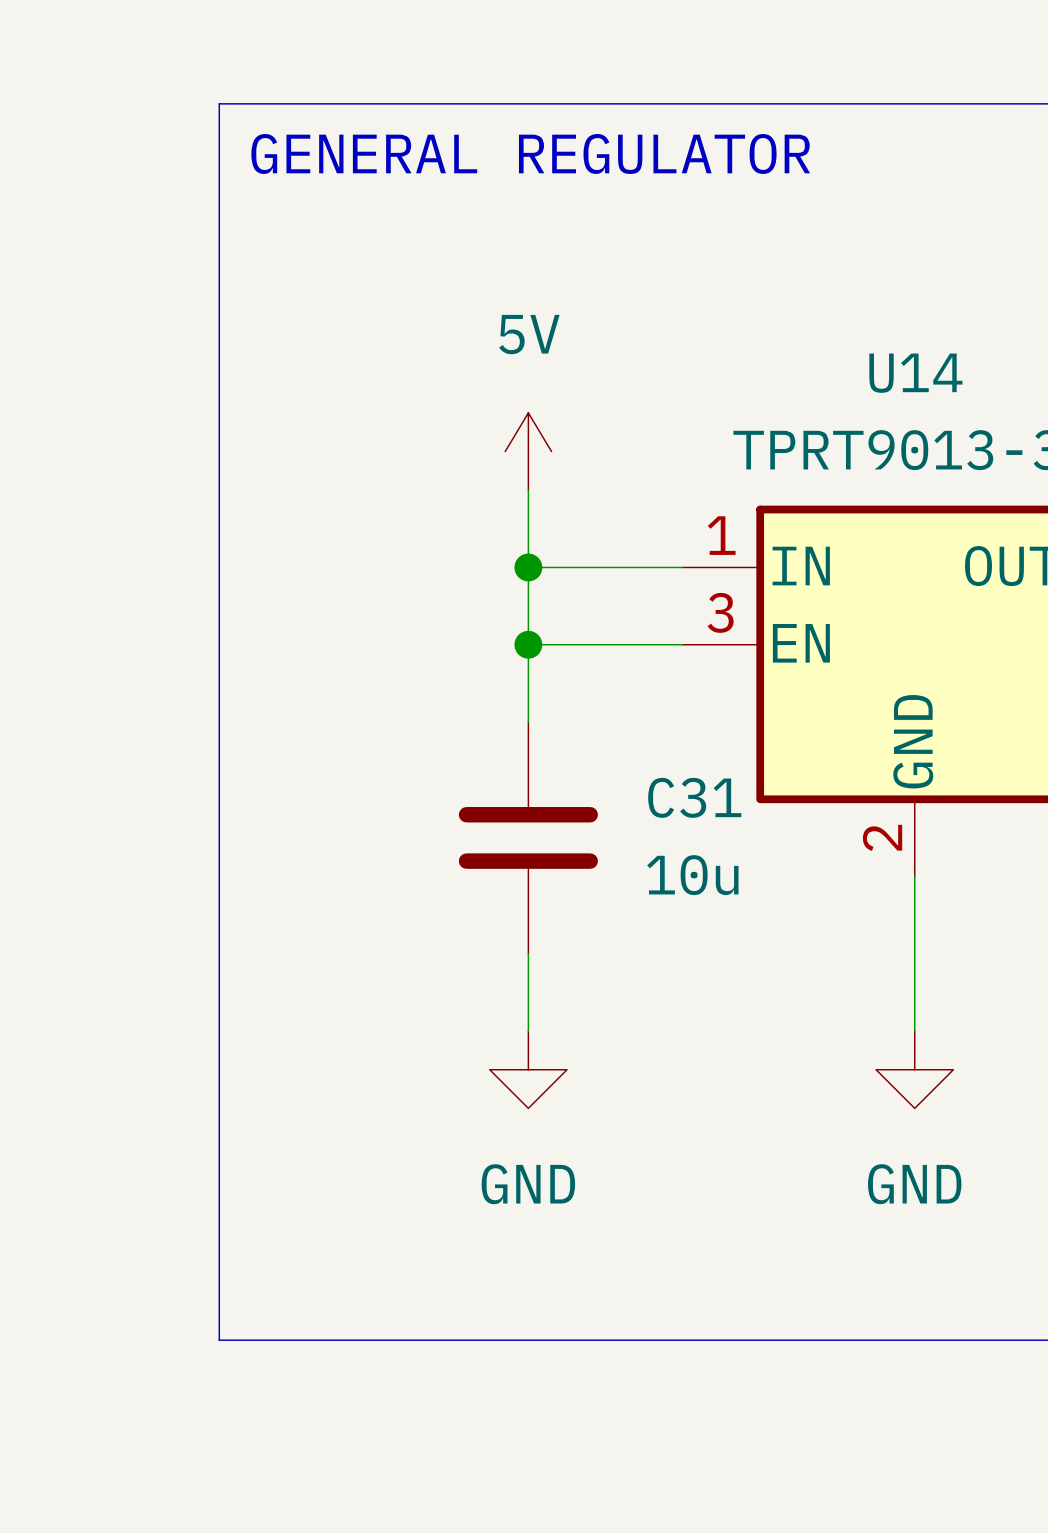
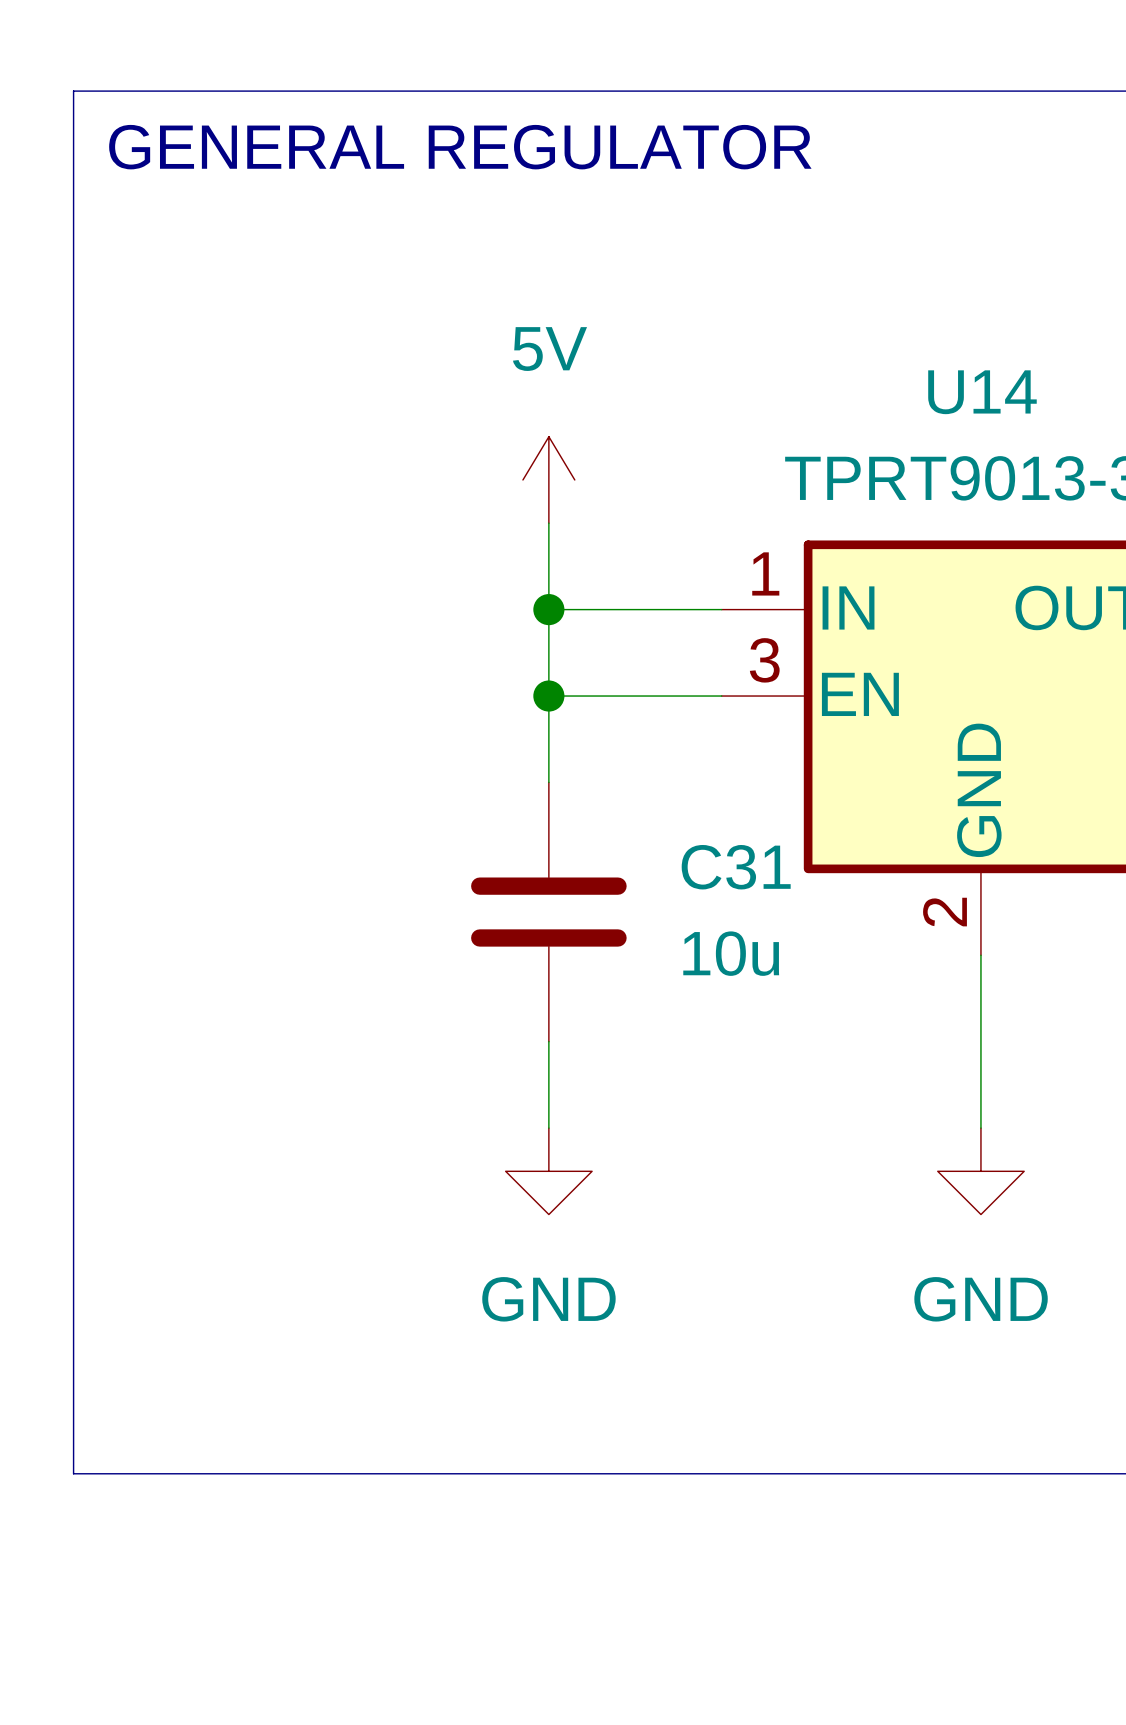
line: (219, 103) (219, 1340) -> (203, 91) (73, 91) (73, 1473) (203, 1473)
text position: GENERAL REGULATOR (530, 153) -> GENERAL REGULATOR (460, 147)

